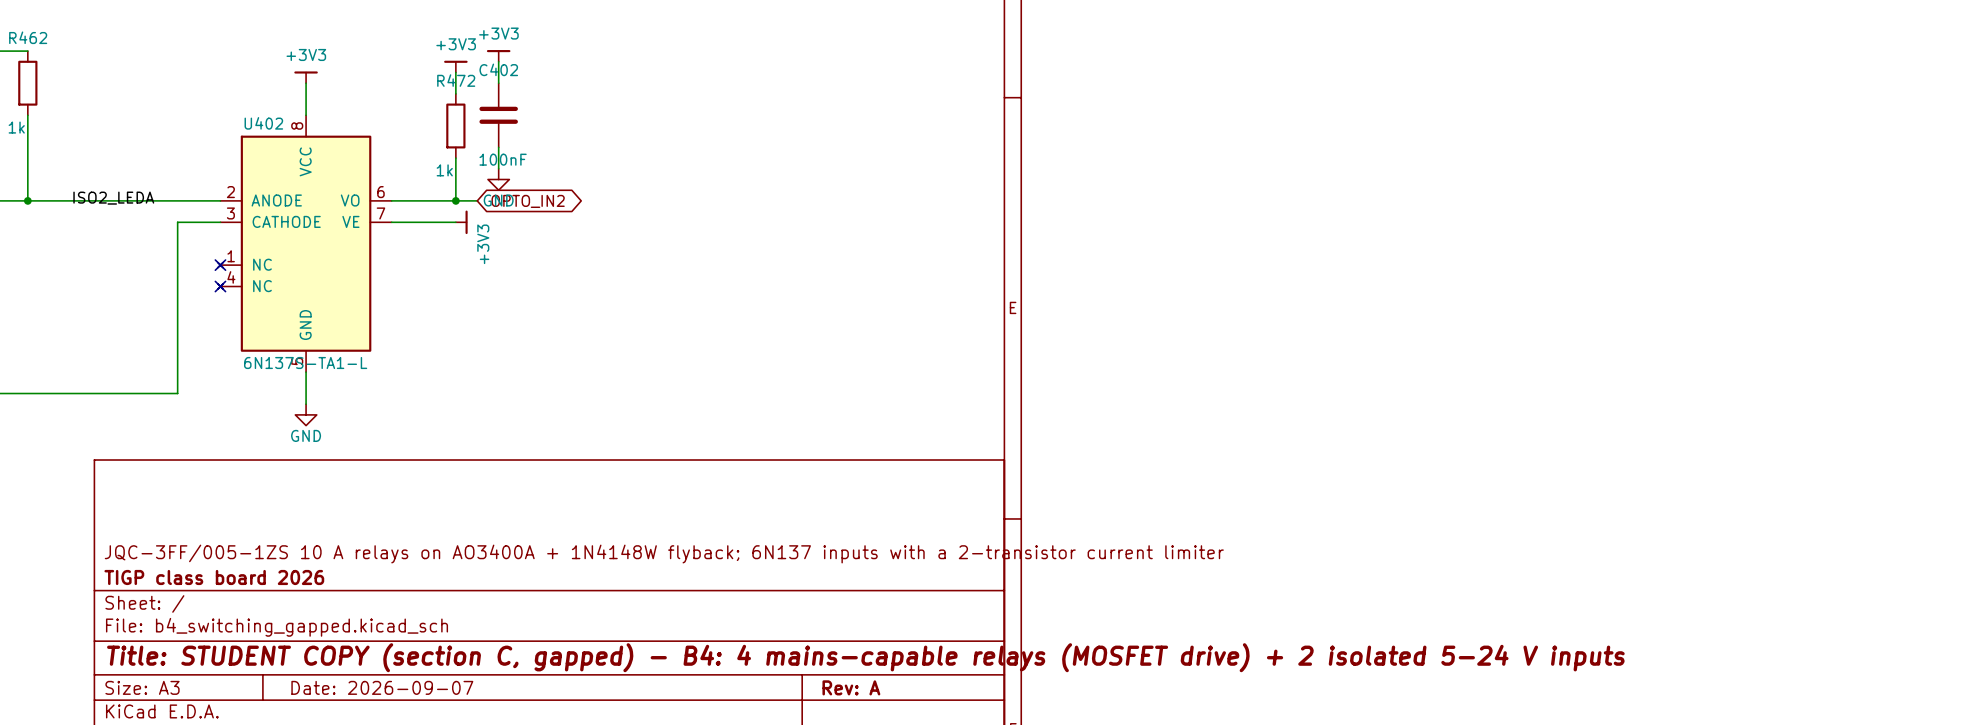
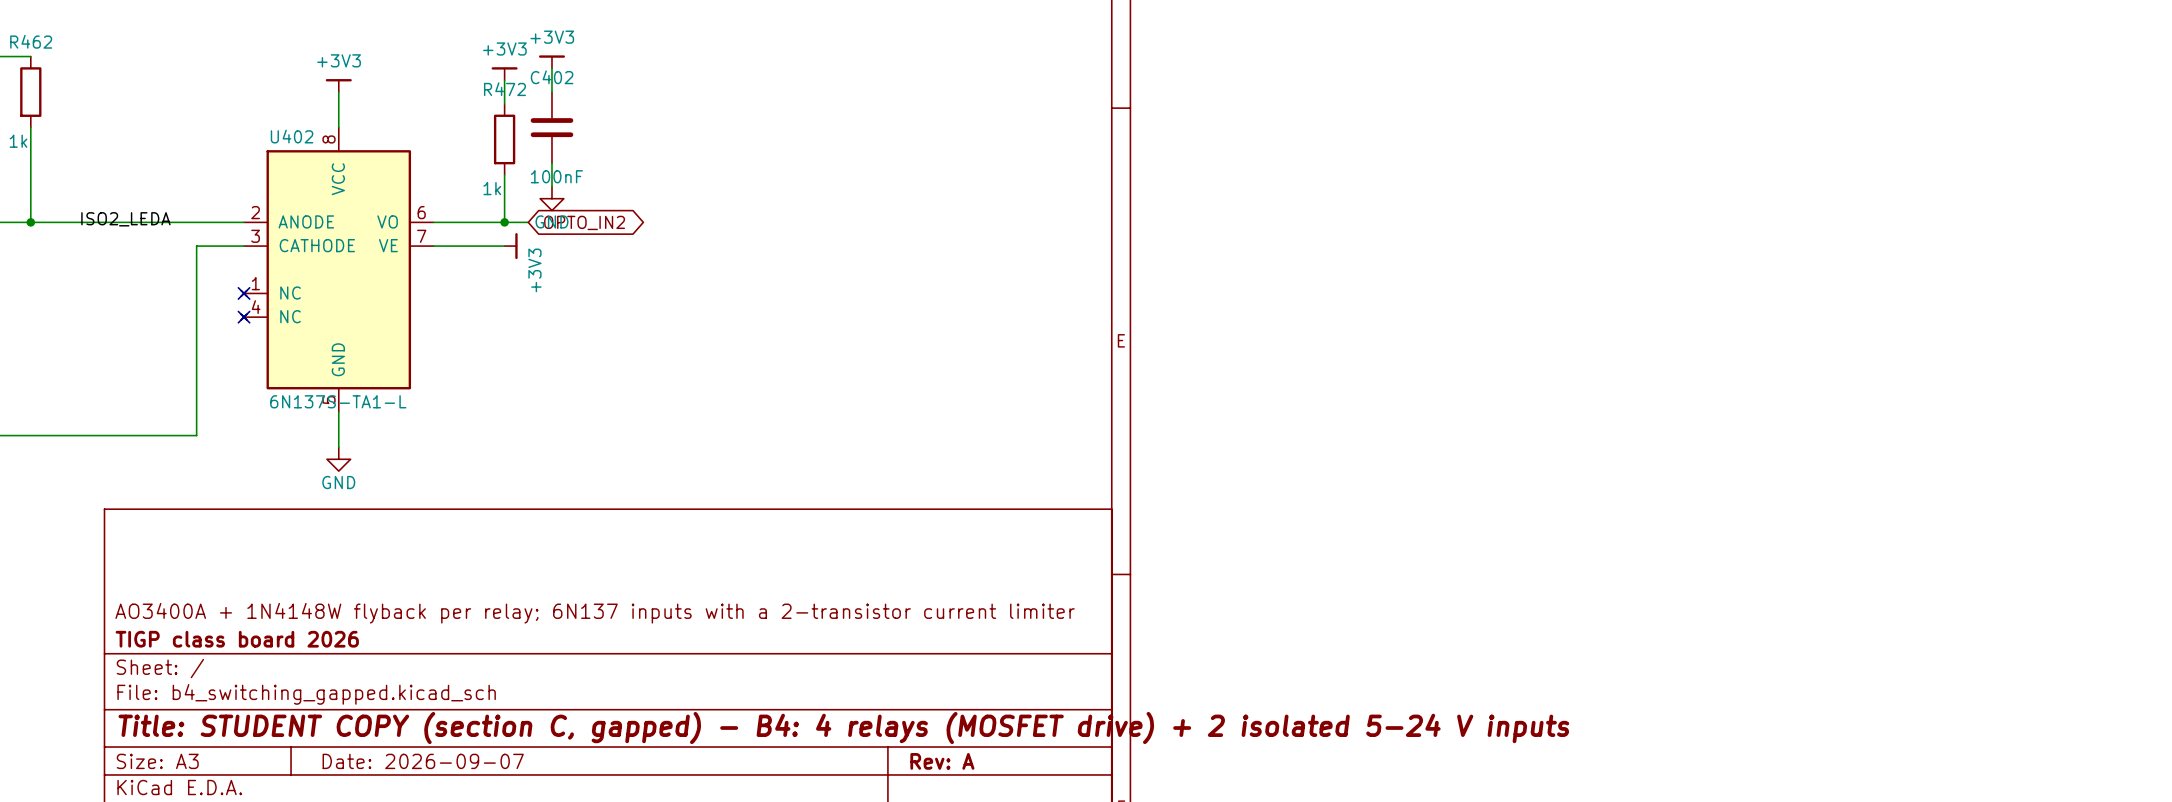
title block: JQC-3FF/005-1ZS 10 A relays on AO3400A + 1N4148W flyback; 6N137 inputs with a 2-transistor current limiter (664, 554) -> AO3400A + 1N4148W flyback per relay; 6N137 inputs with a 2-transistor current limiter (595, 613)
title block: Title: STUDENT COPY (section C, gapped) - B4: 4 mains-capable relays (MOSFET drive) + 2 isolated 5-24 V inputs (865, 657) -> Title: STUDENT COPY (section C, gapped) - B4: 4 relays (MOSFET drive) + 2 isolated 5-24 V inputs (843, 728)

